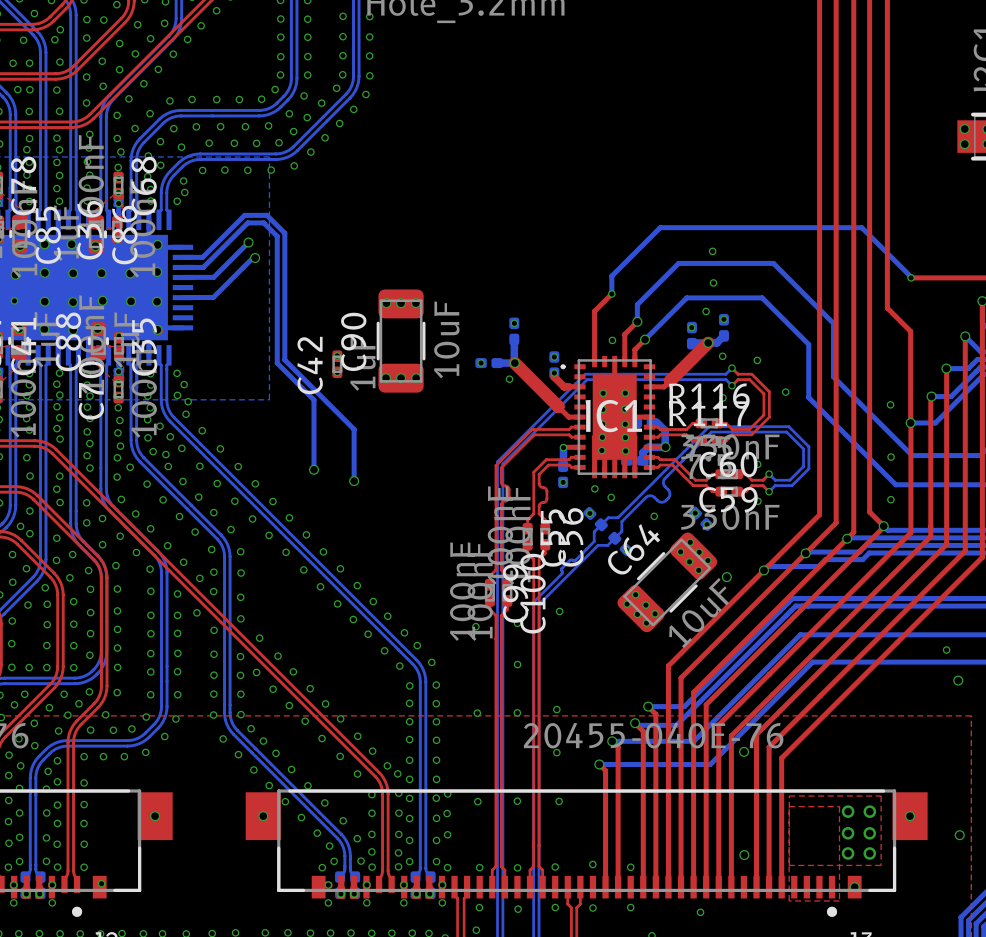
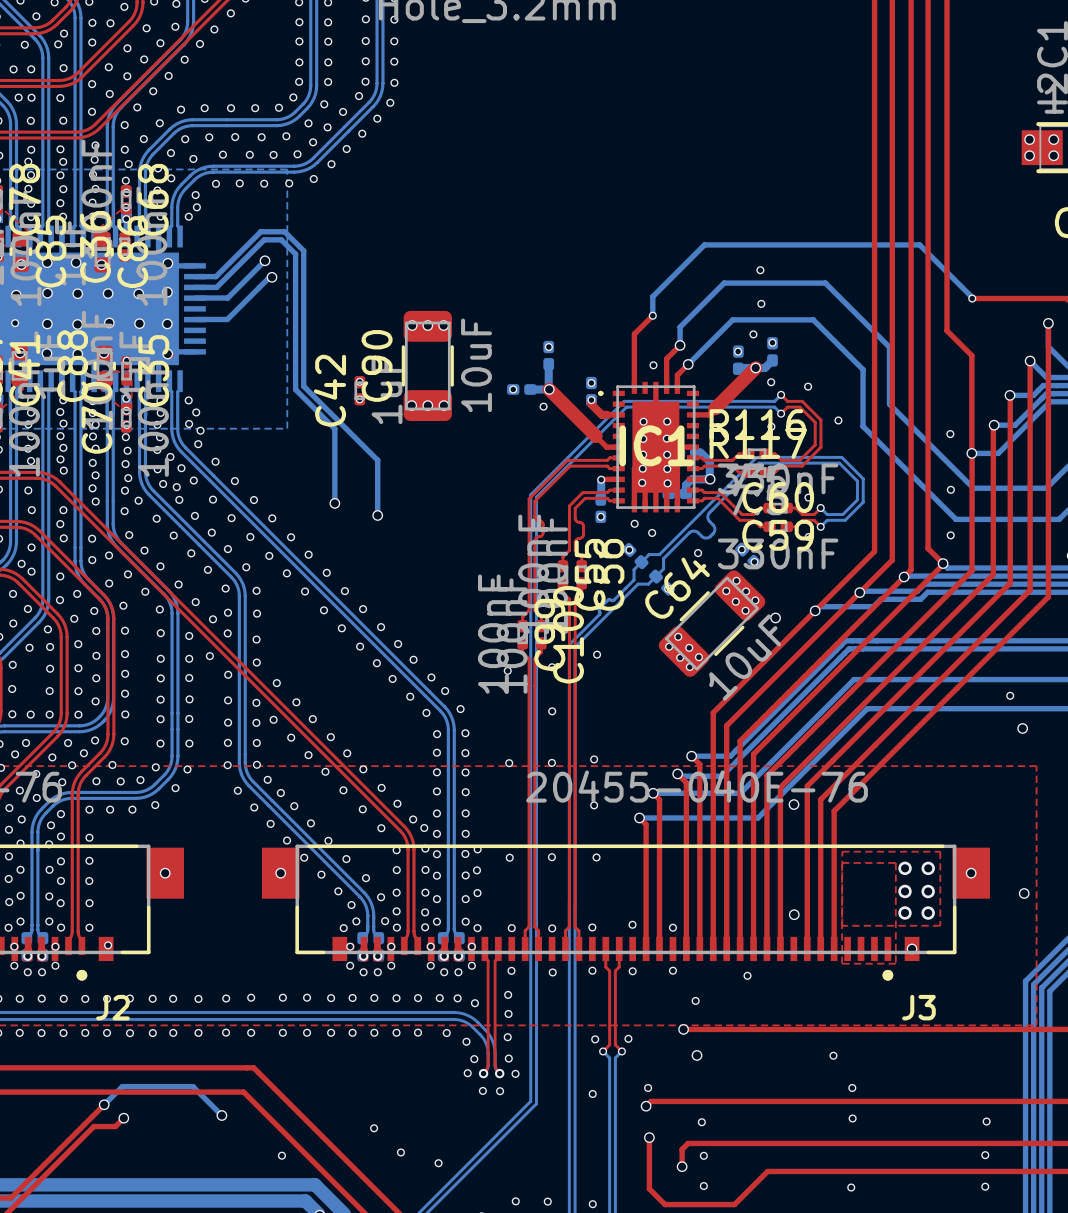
via: none -> (27, 972)
via: none -> (42, 972)
via: none -> (363, 972)
via: none -> (377, 972)
via: none -> (444, 972)
via: none -> (458, 972)

